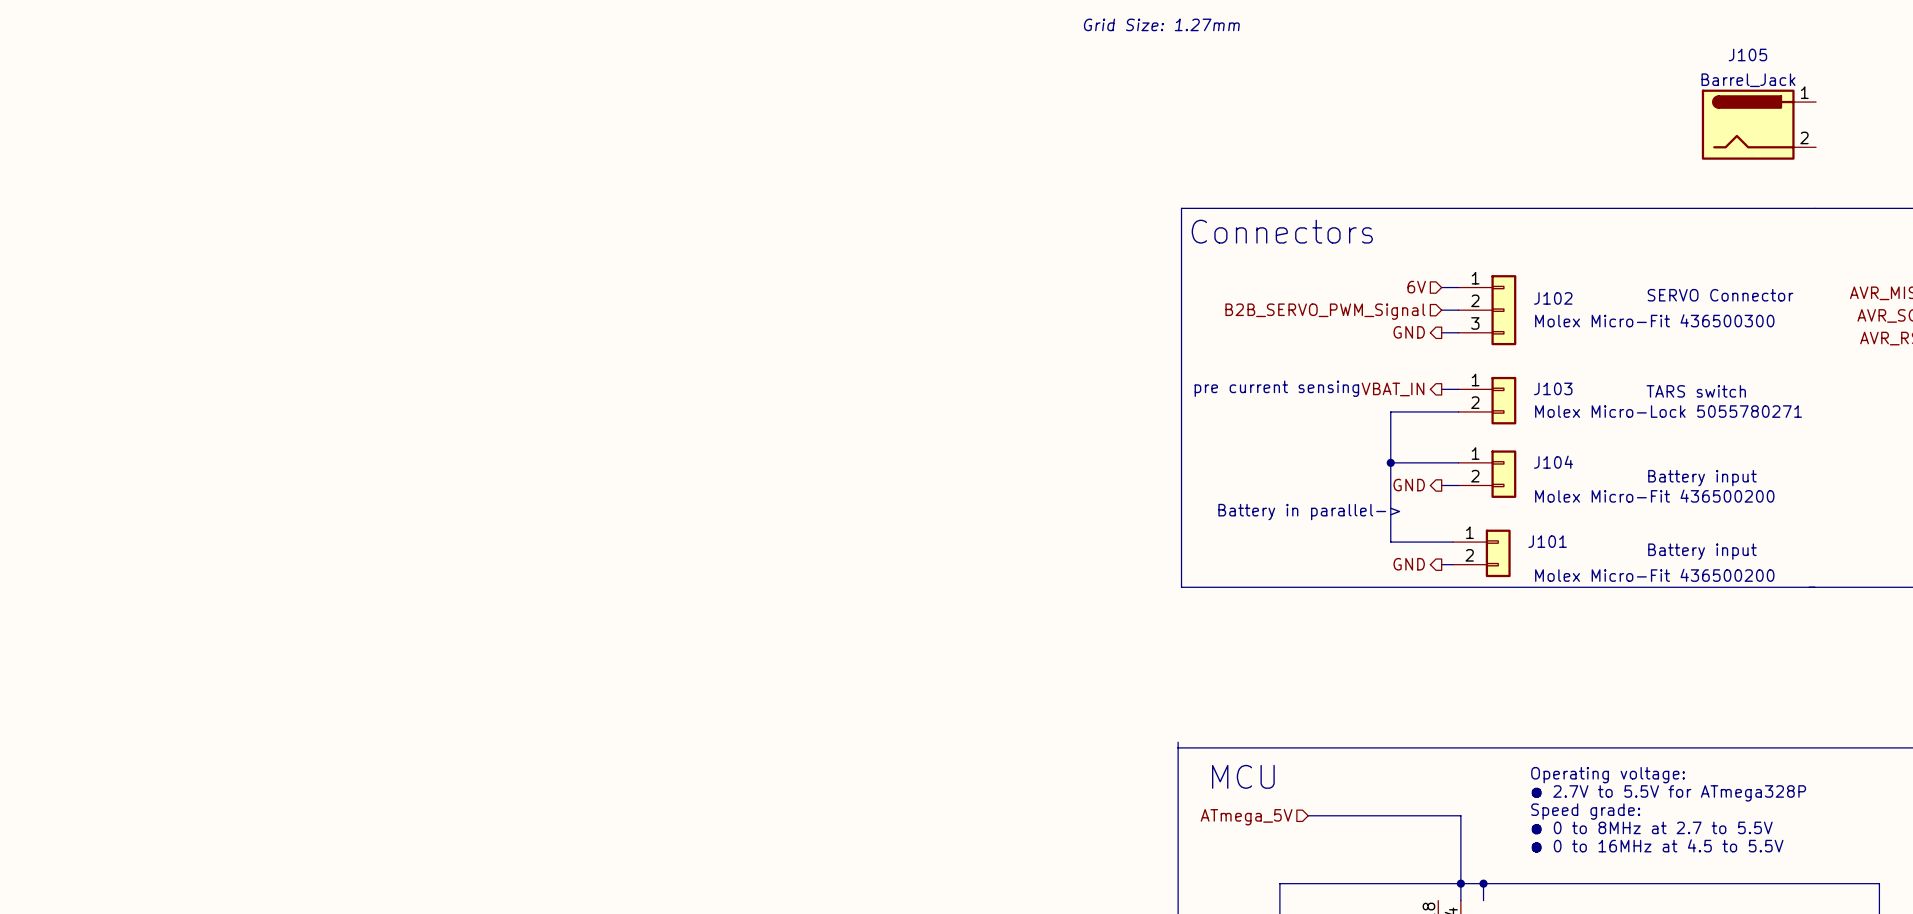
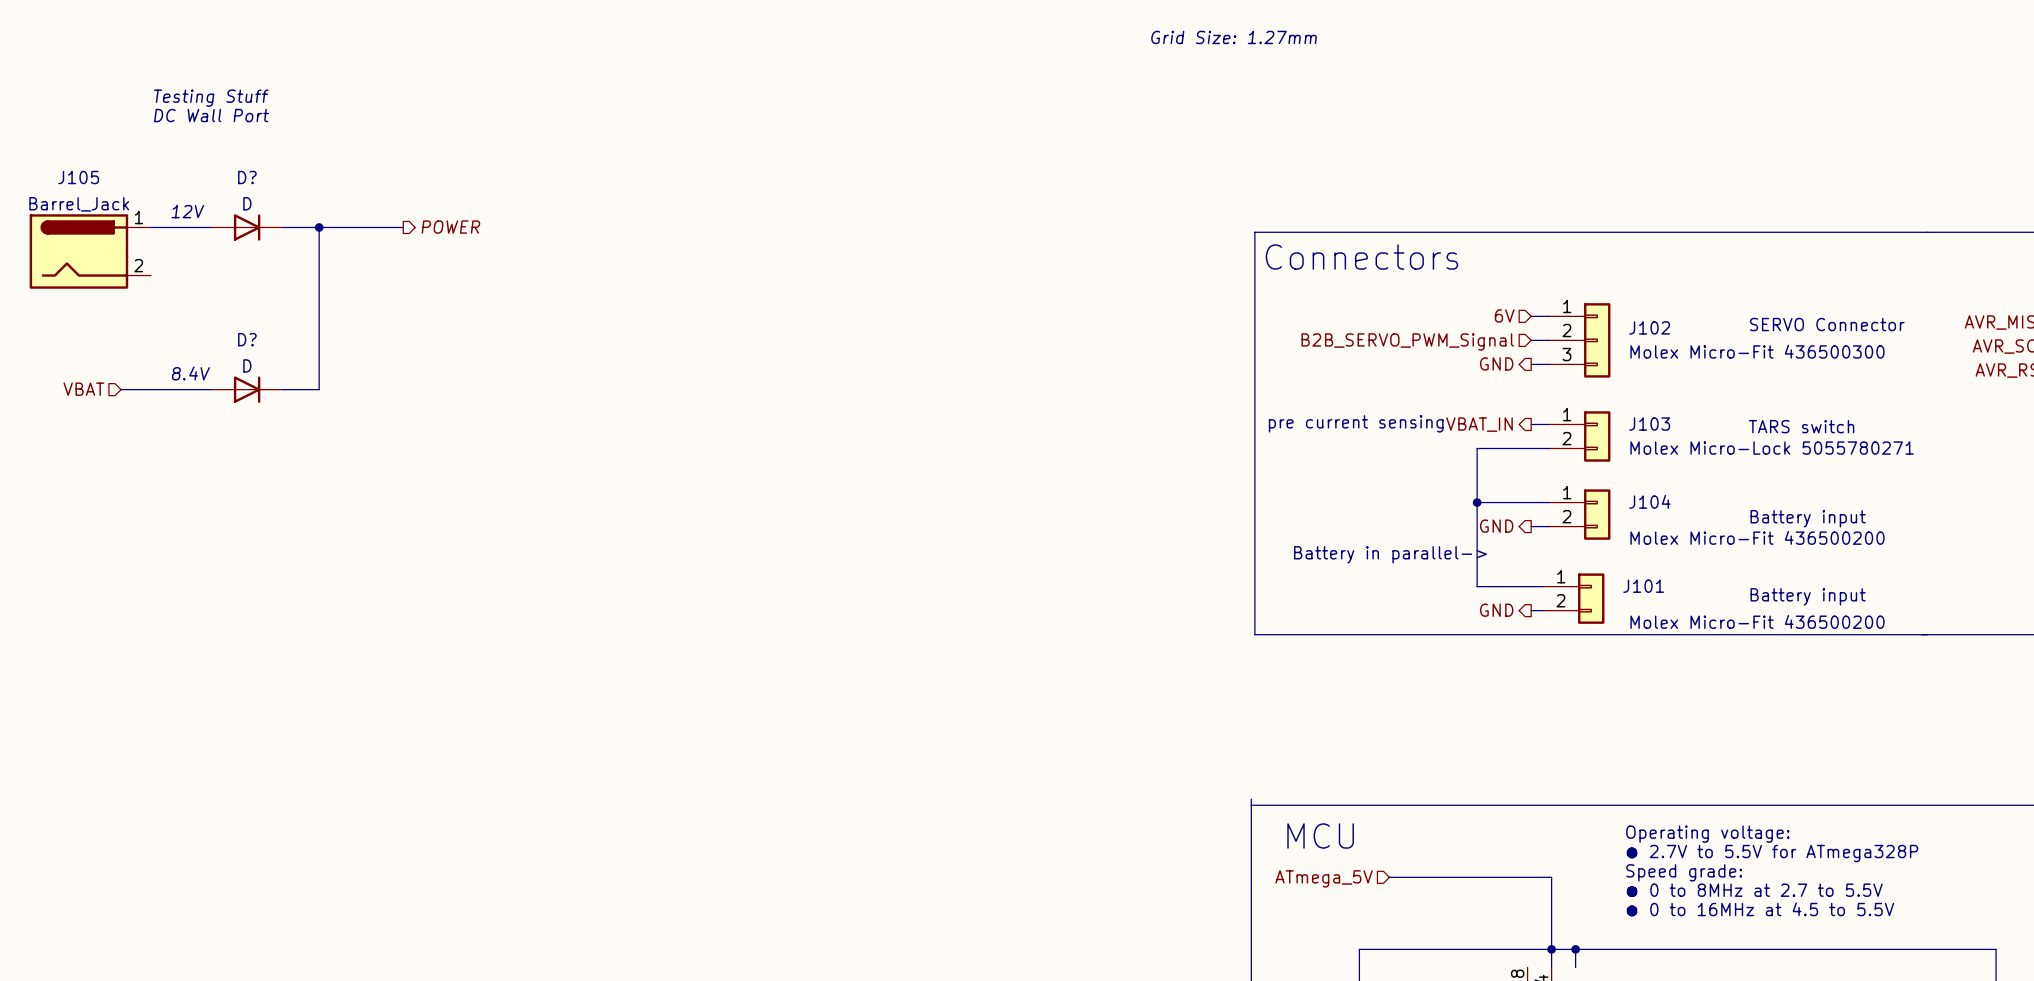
text: none -> Testing Stuff (211, 98)
text: none -> DC Wall Port (211, 115)
J105 position: (1758, 124) -> (90, 251)
text: none -> 12V (187, 211)
wire: none -> (151, 227) (211, 227)
D?: none -> D (247, 227)
wire: none -> (283, 227) (403, 227)
wire: none -> (319, 227) (319, 389) (283, 389)
junction: none -> (319, 227)
hierarchical label: none -> POWER (450, 227)
text: none -> 8.4V (190, 373)
hierarchical label: none -> VBAT (83, 389)
wire: none -> (120, 389) (211, 389)
D?: none -> D (247, 389)

